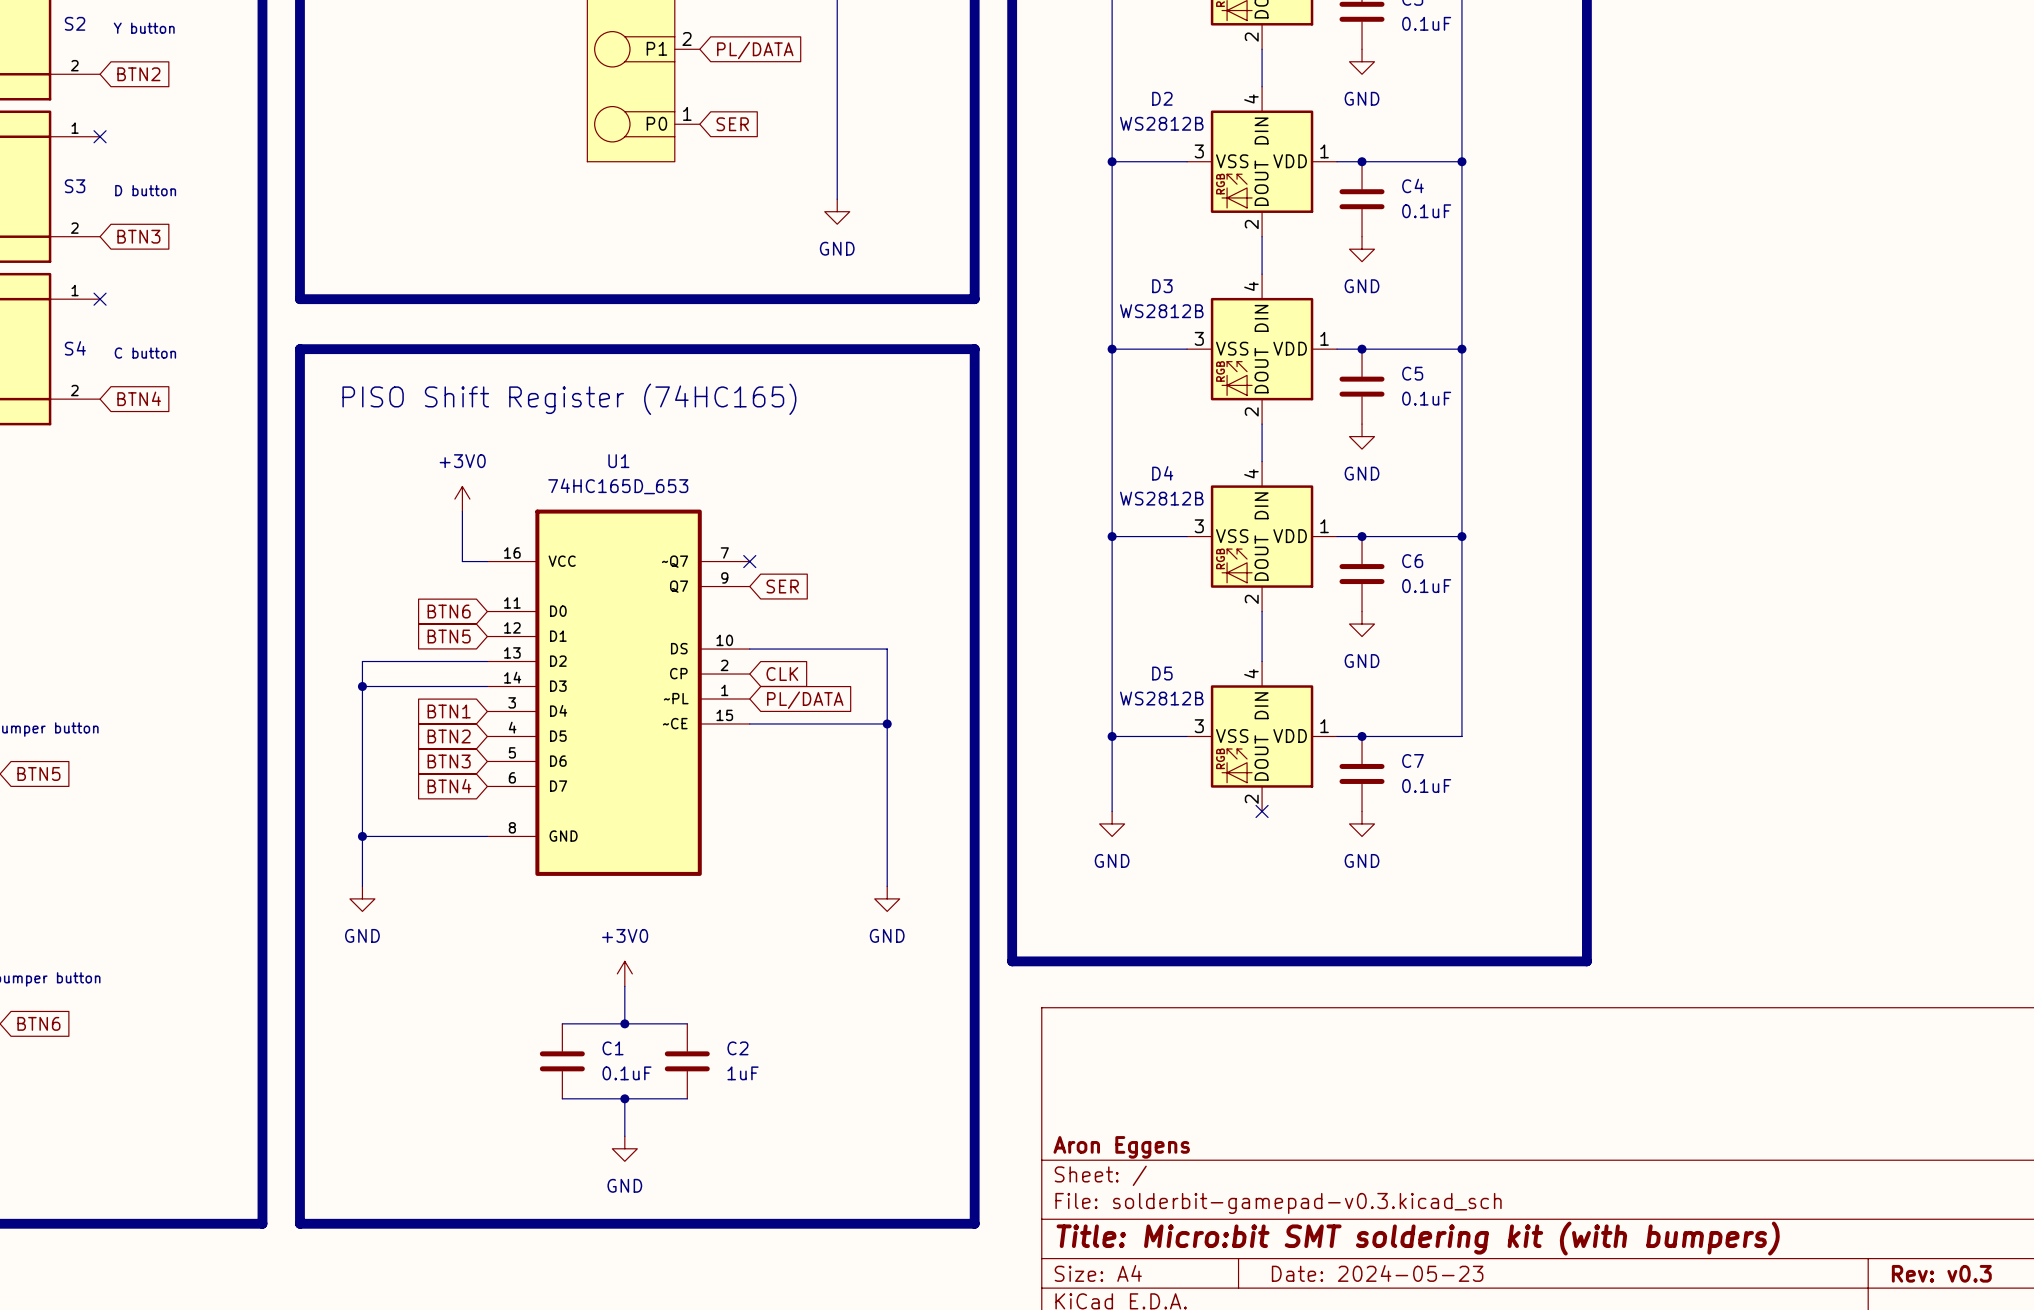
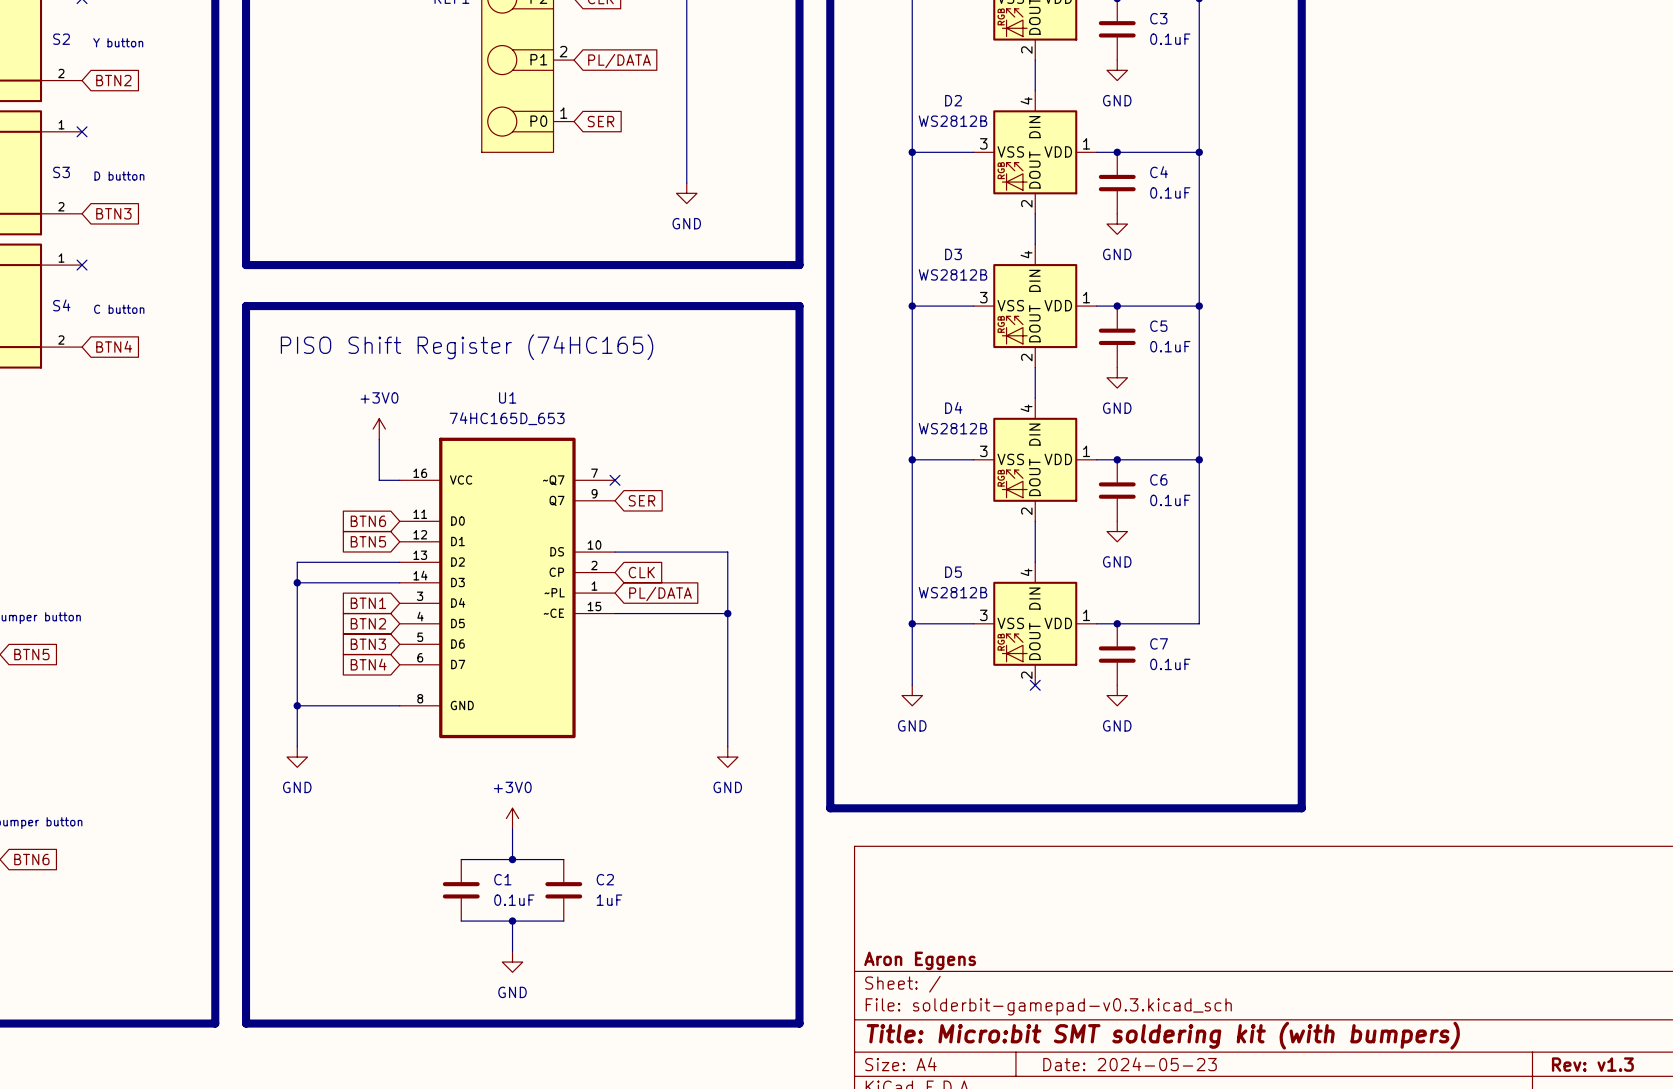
title block: Rev: v0.3 (1941, 1273) -> Rev: v1.3 (1592, 1064)

